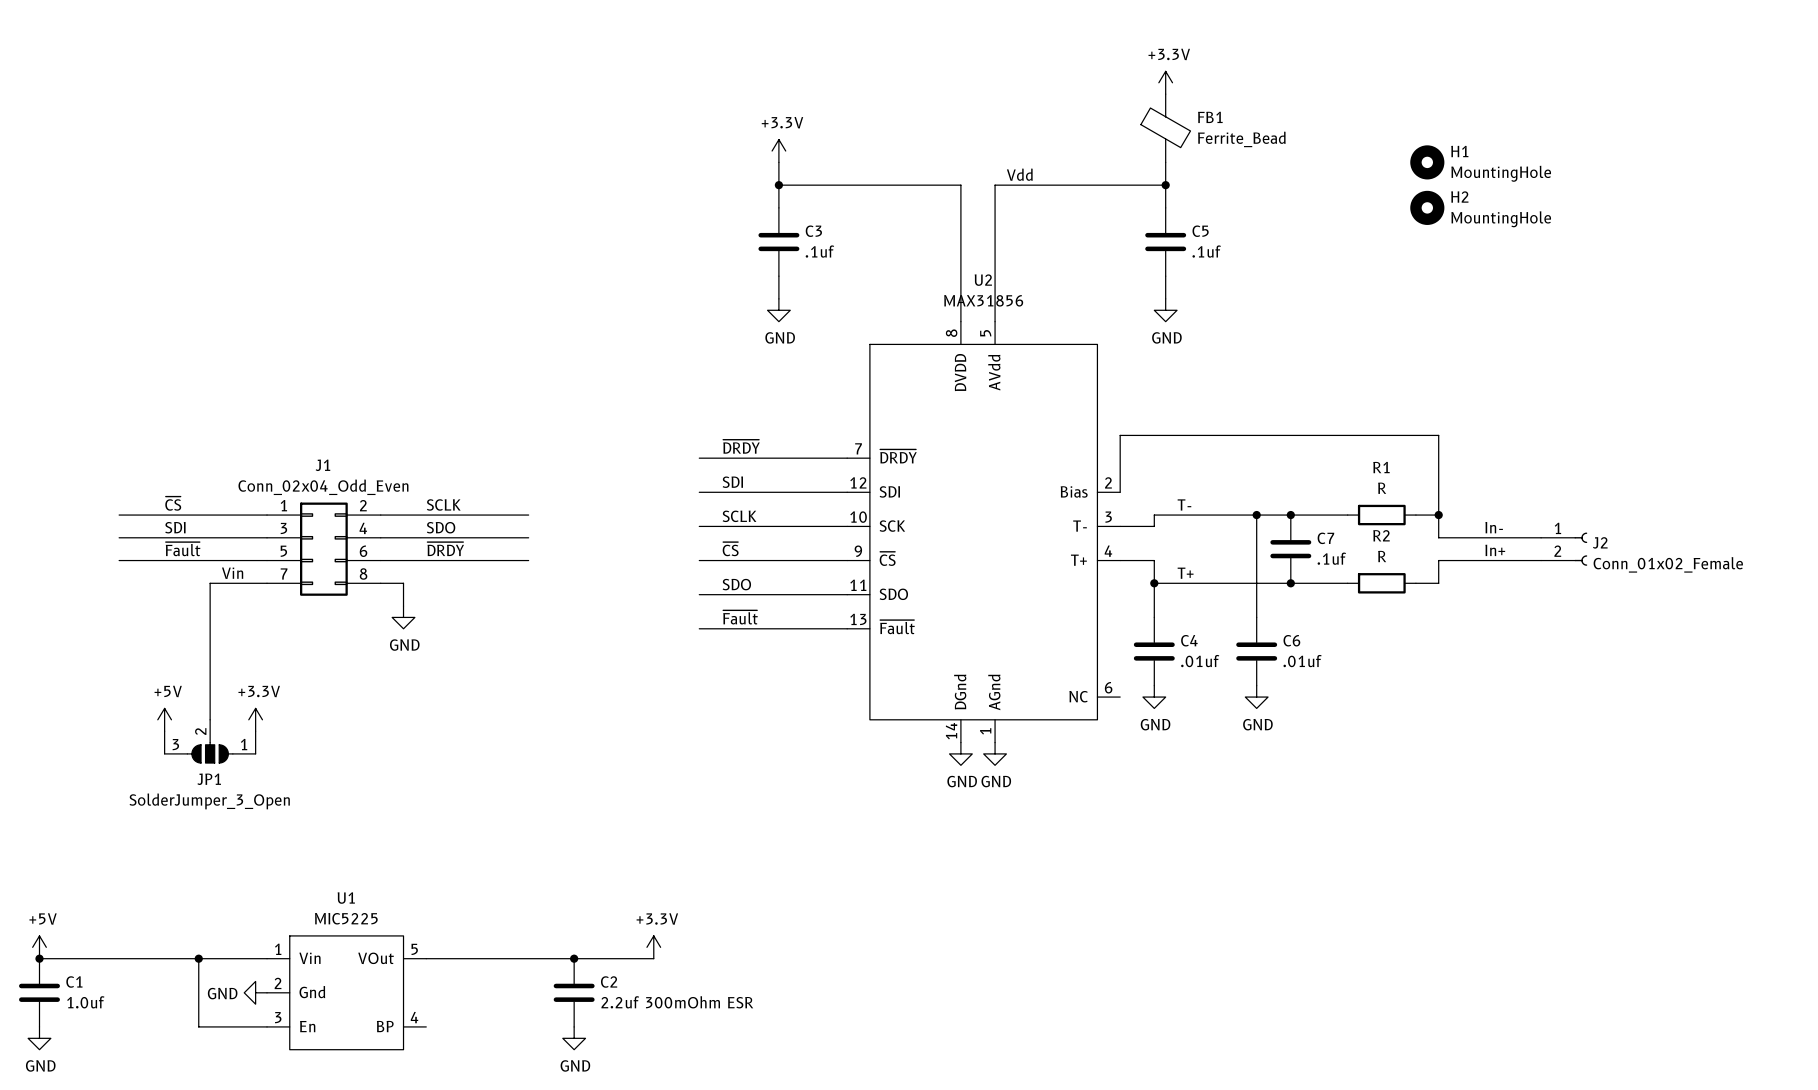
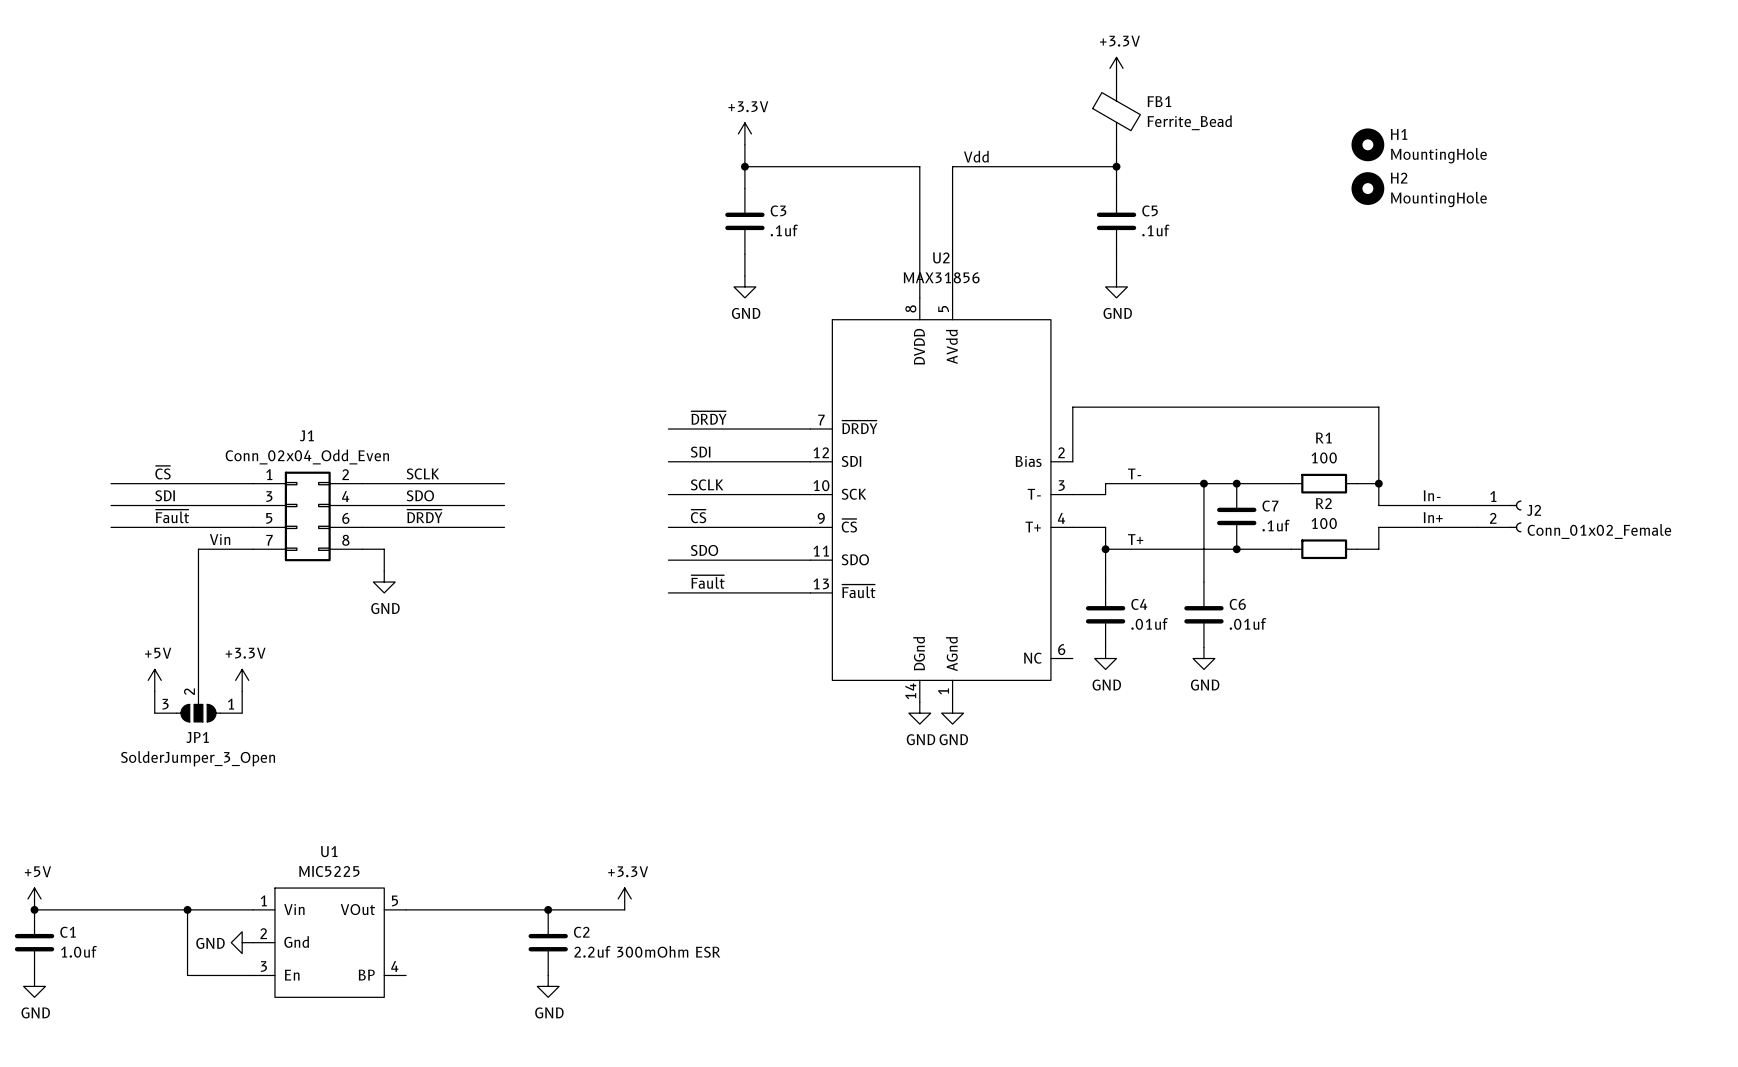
R1 value: R (1382, 488) -> 100 (1324, 457)
R2 value: R (1382, 556) -> 100 (1324, 523)

